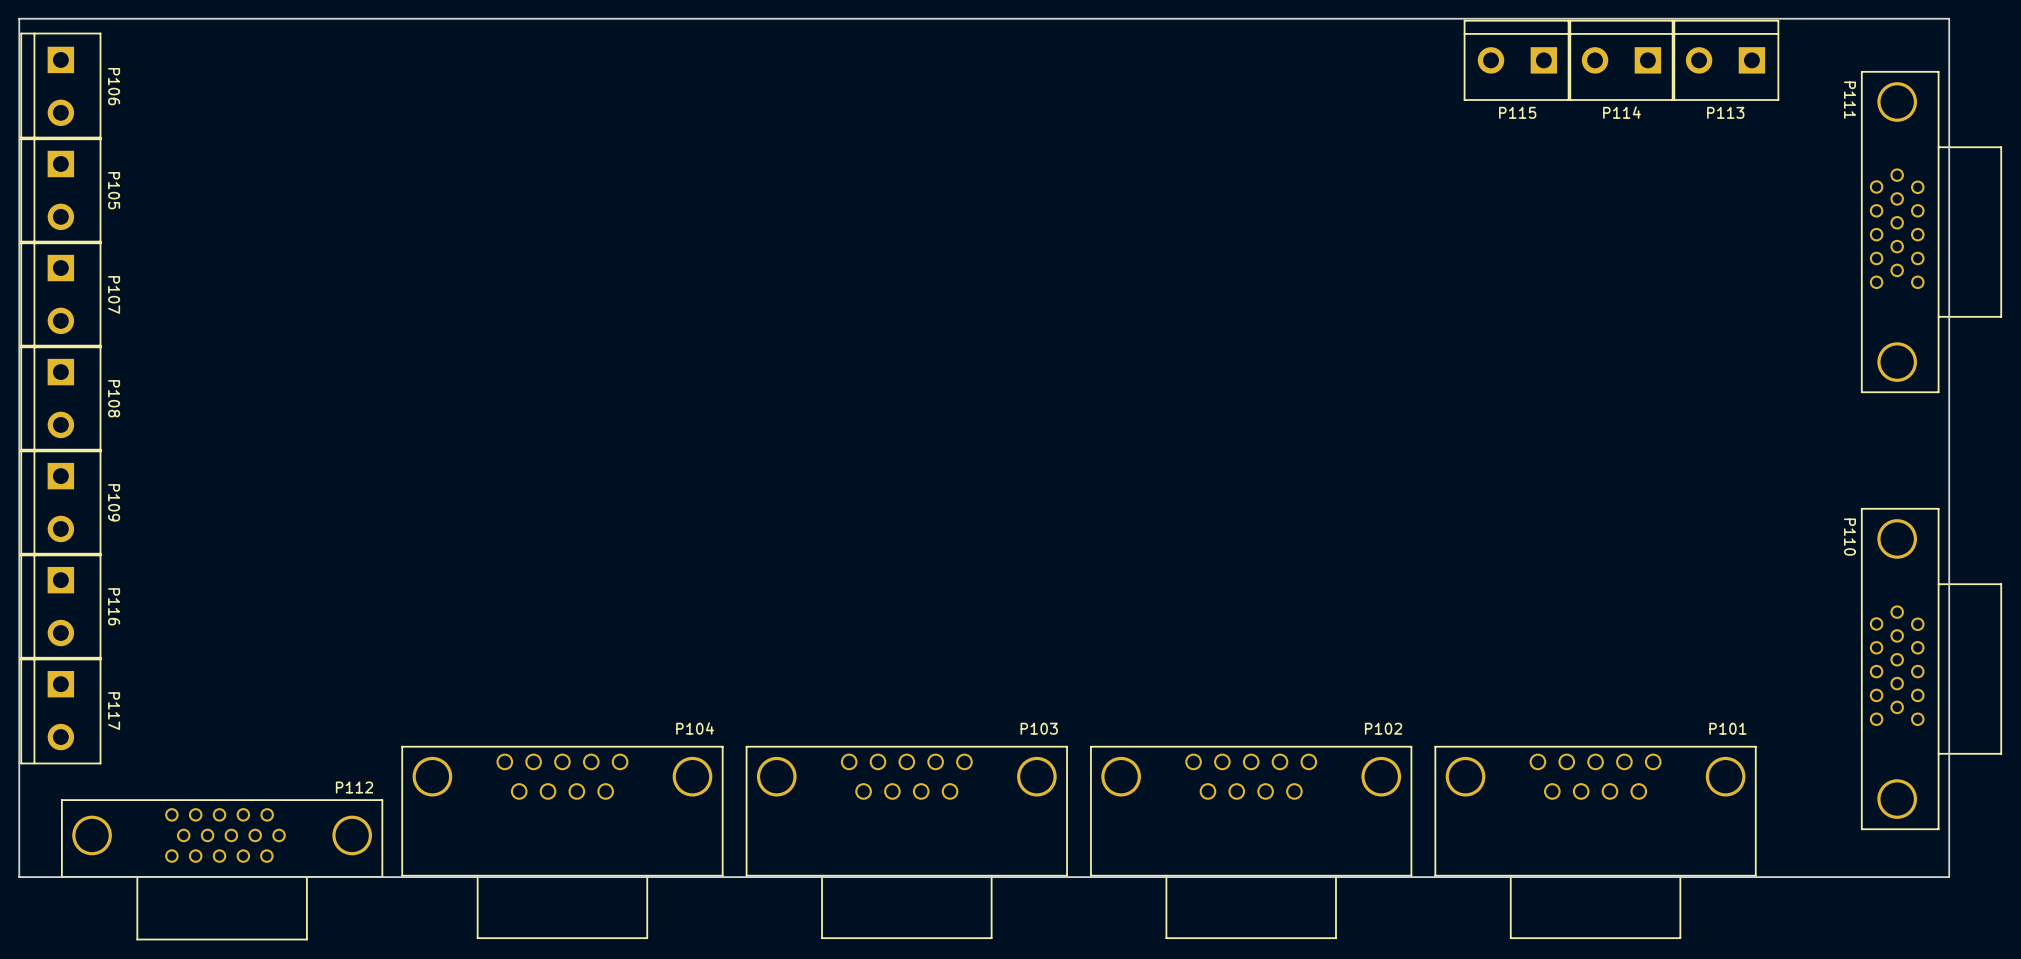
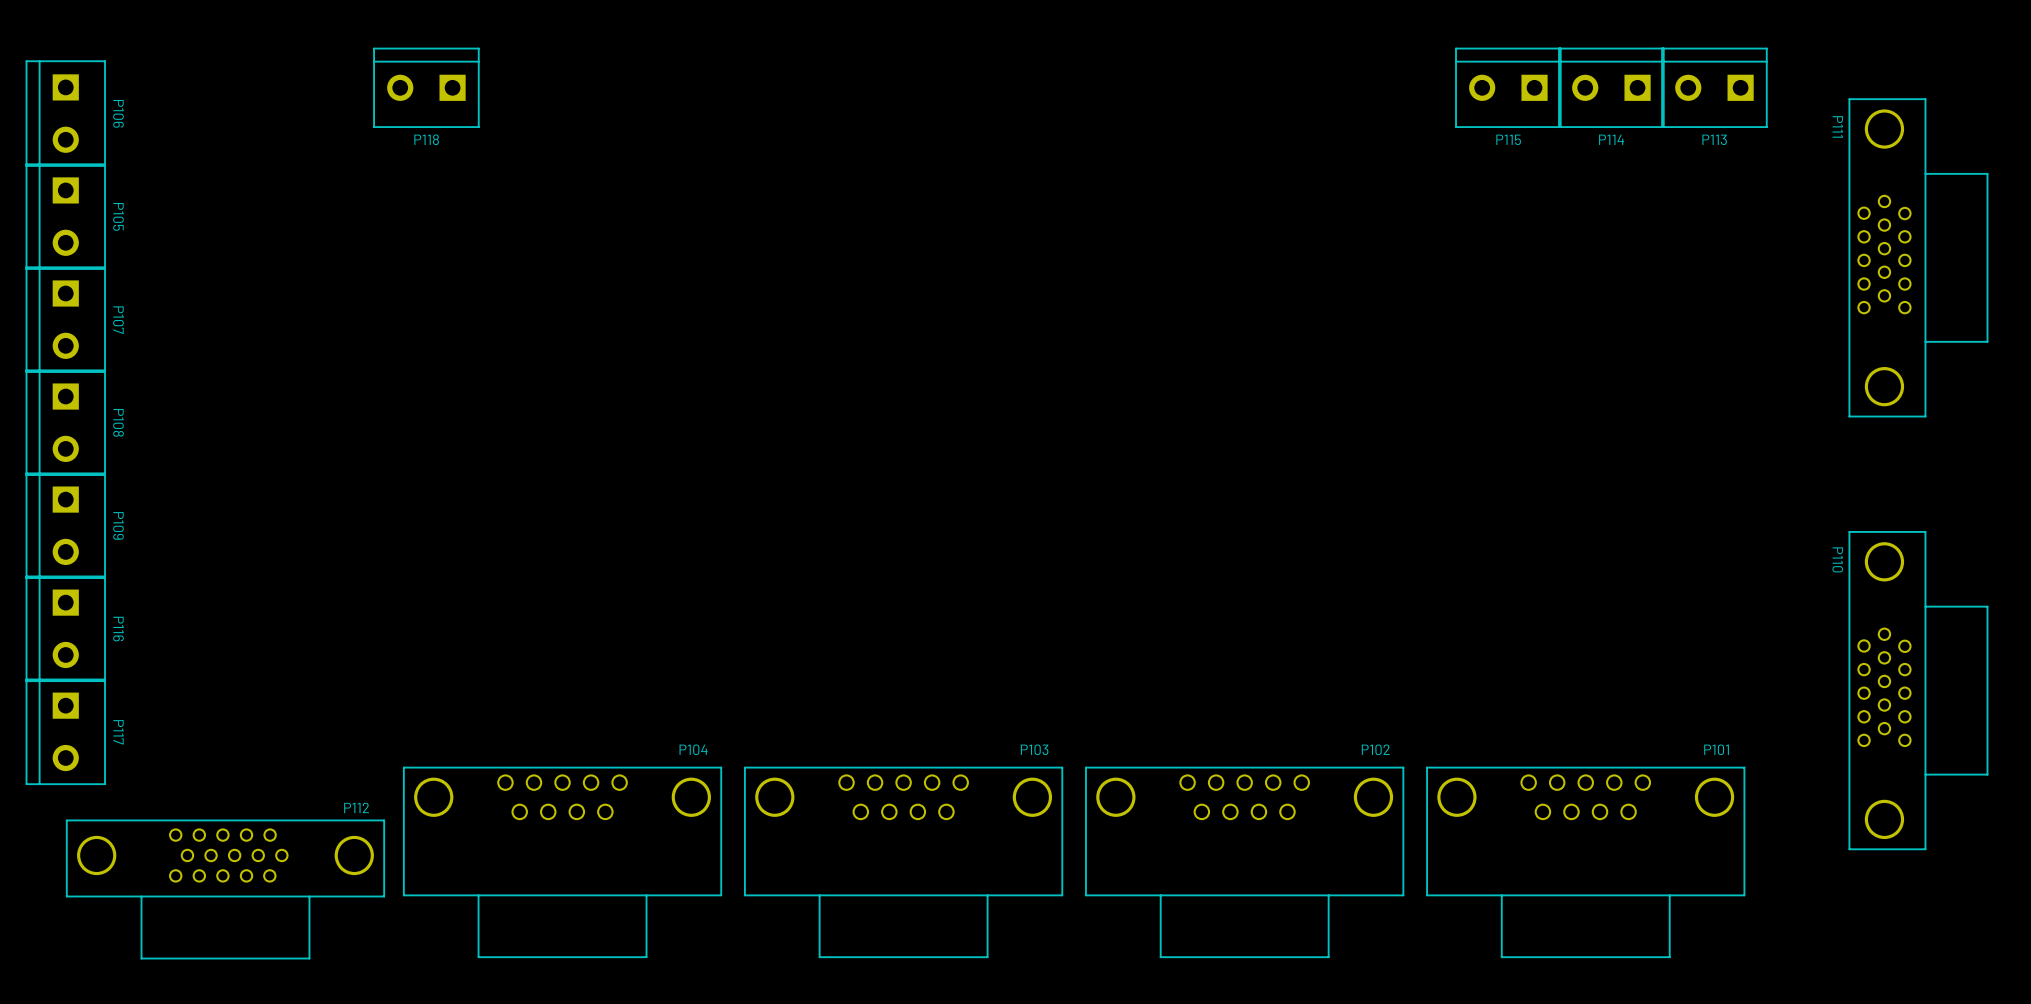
board edge: (1949, 18) (19, 18) (19, 877) (1949, 877) (1949, 18) -> none
P118: none -> (426, 87)

